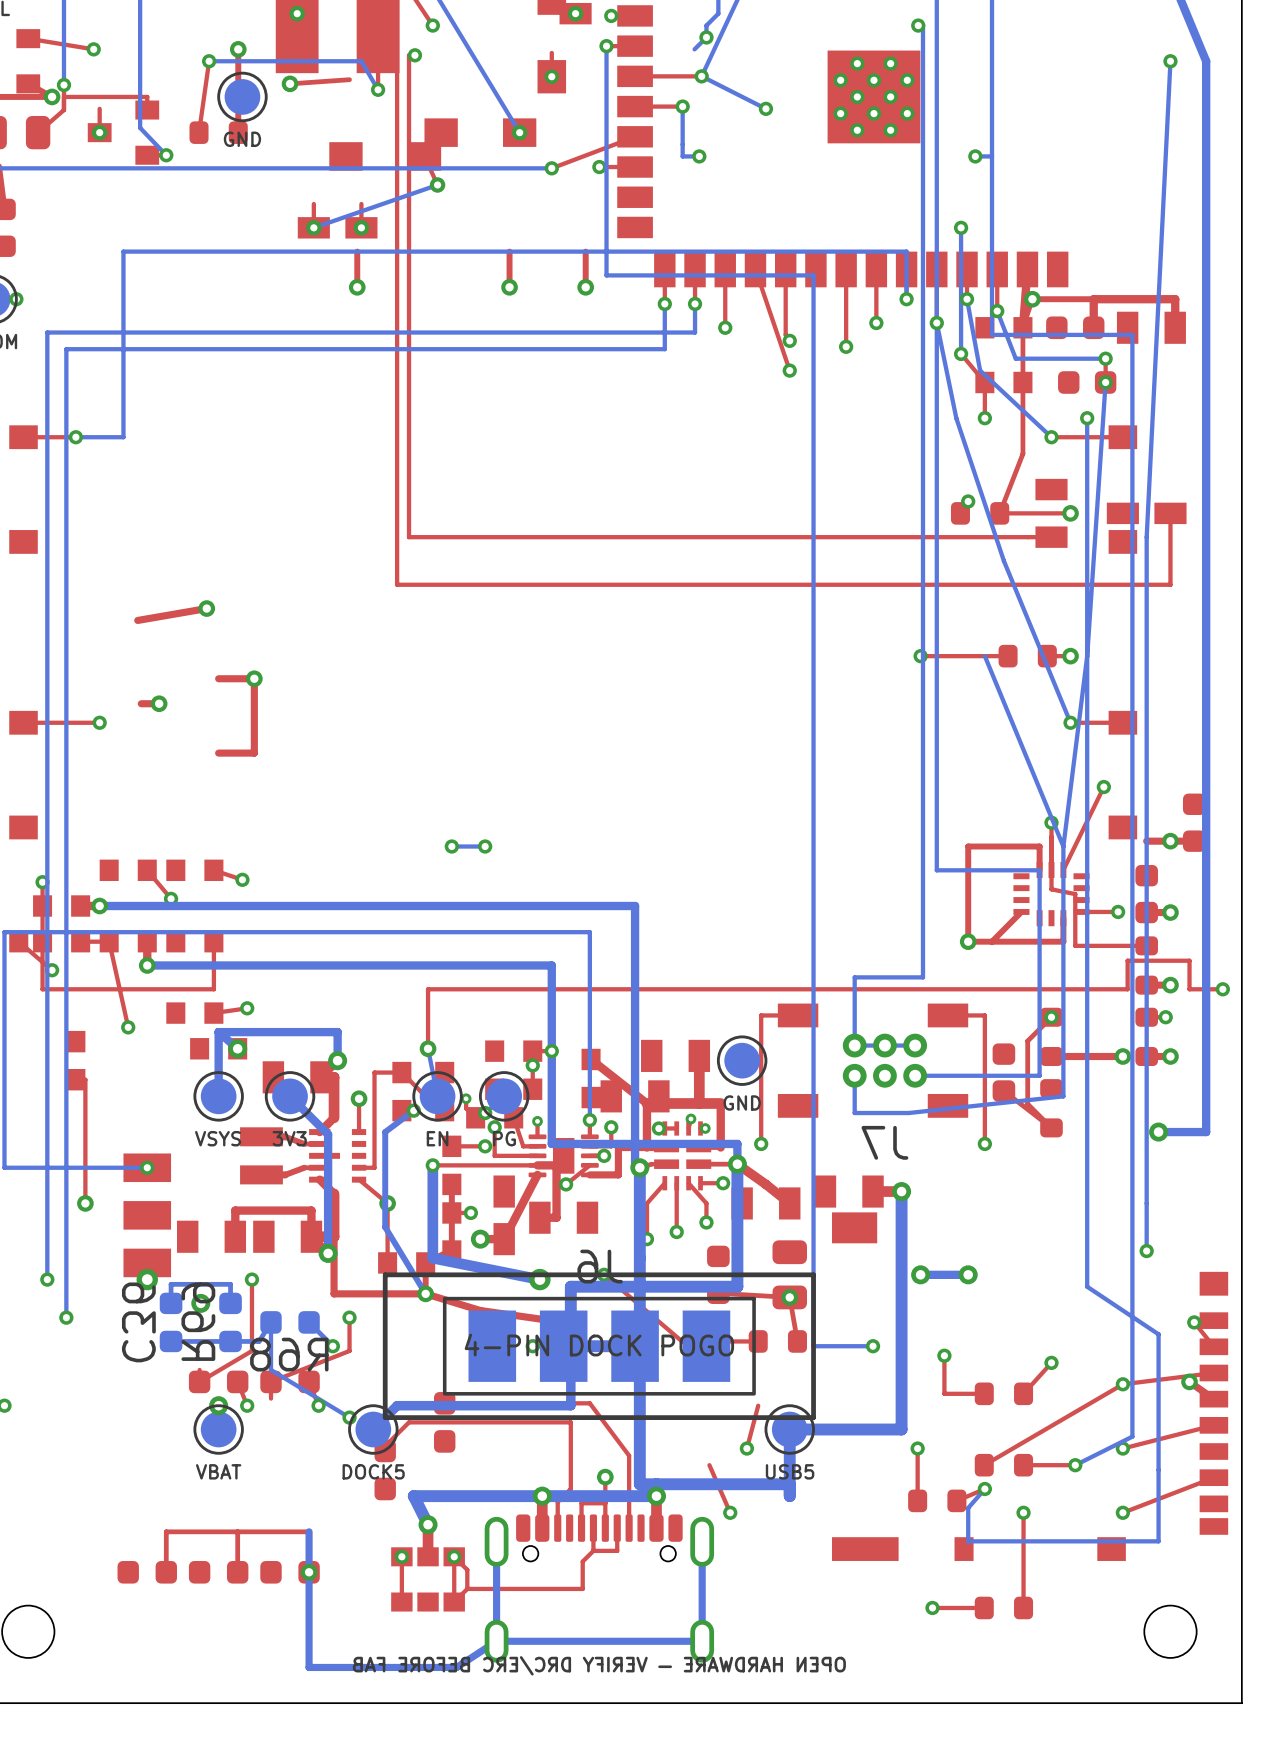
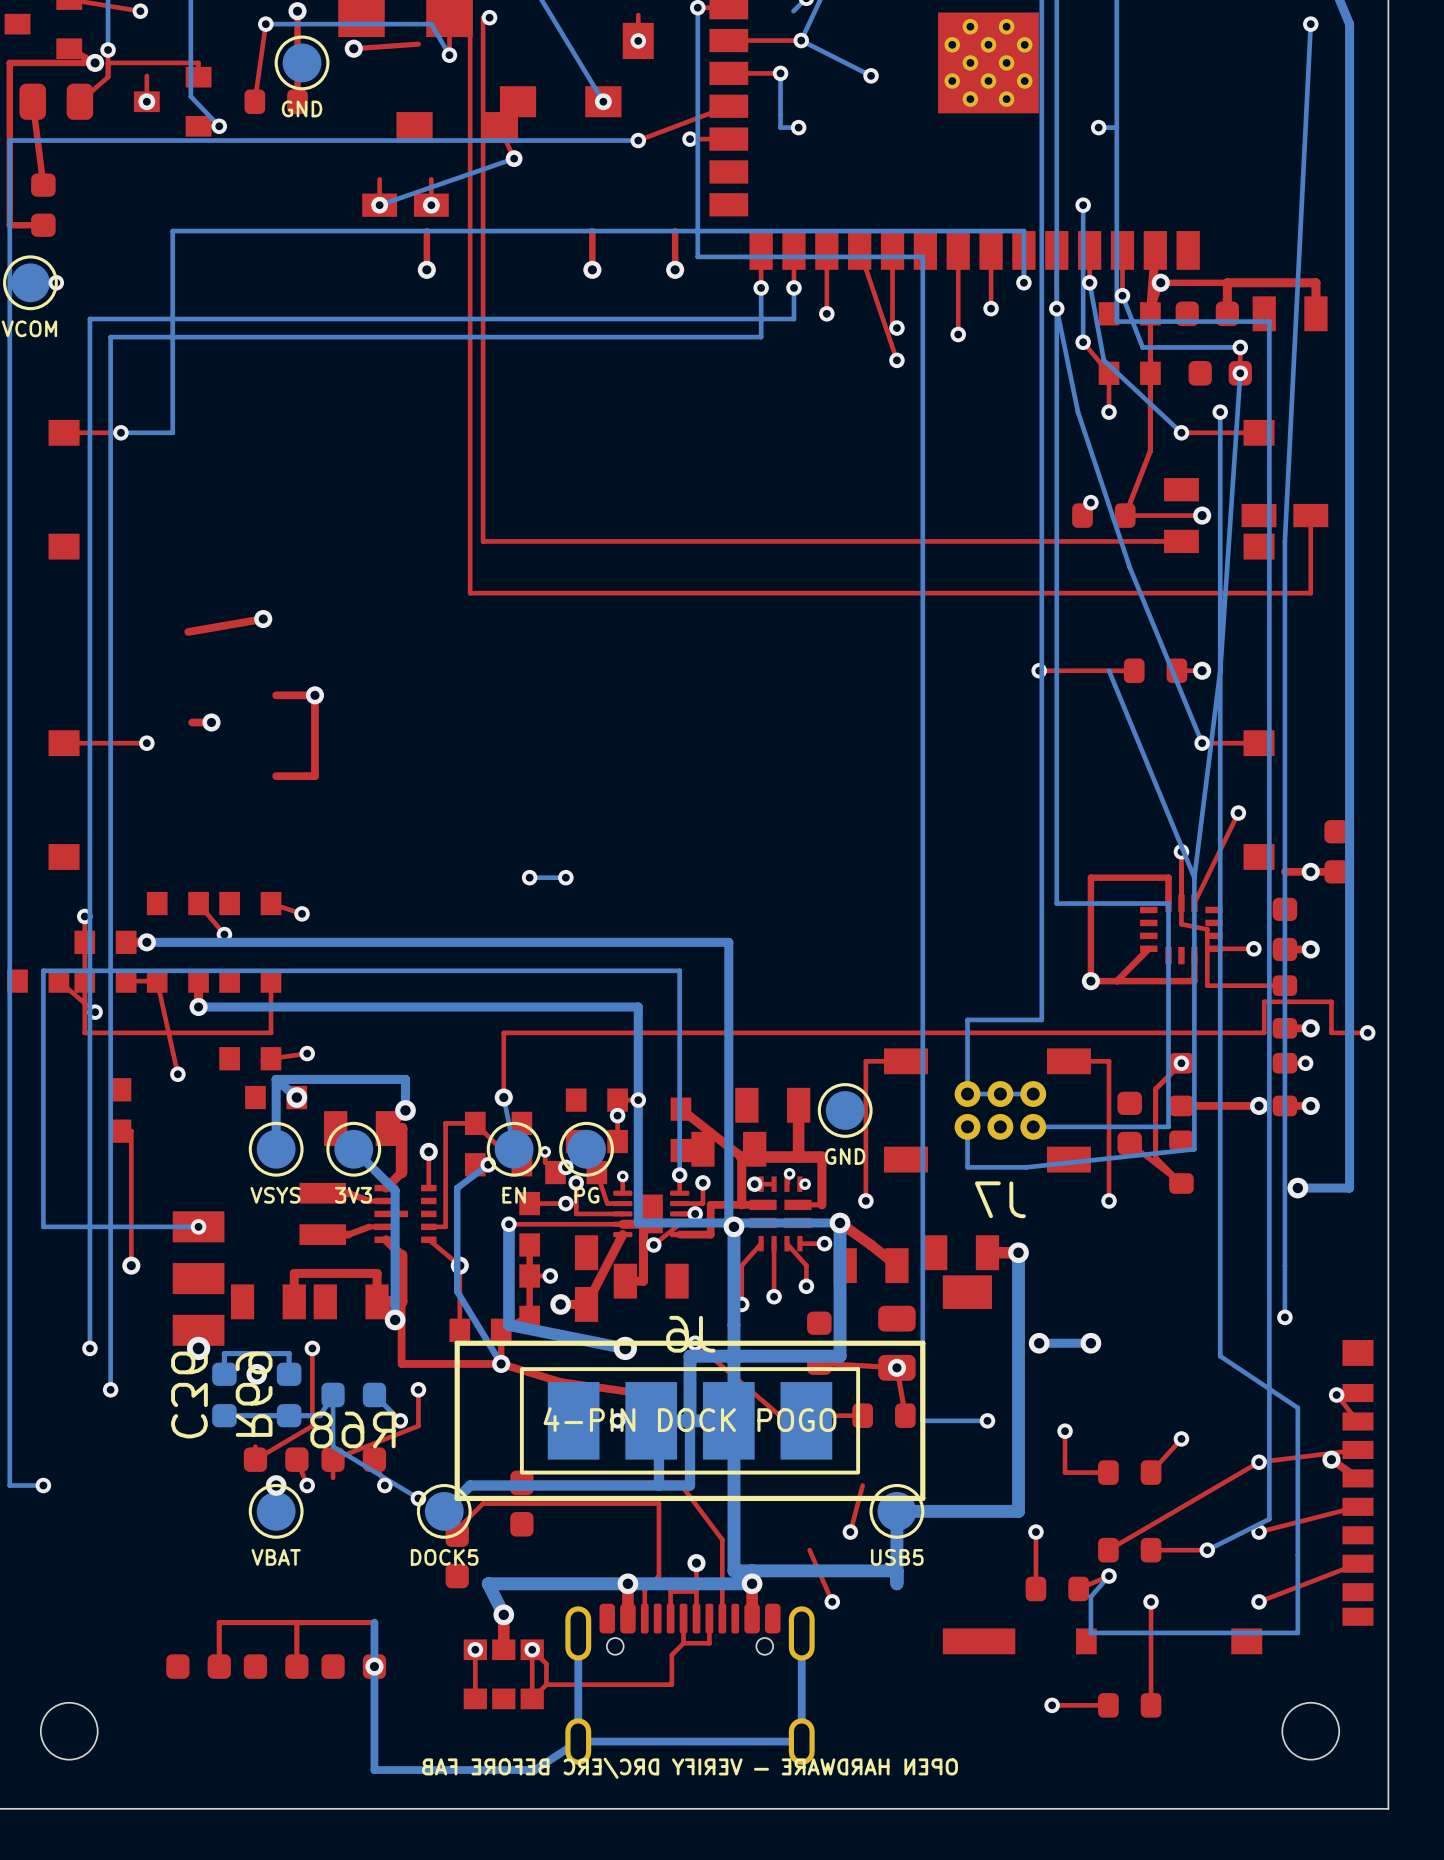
bottom track: (551, 1143) (737, 1143) (737, 1164) -> (638, 1200) (638, 1222) (840, 1222)
bottom track: (599, 1286) (570, 1286) (570, 1346) -> (690, 1356) (690, 1485) (658, 1485)

